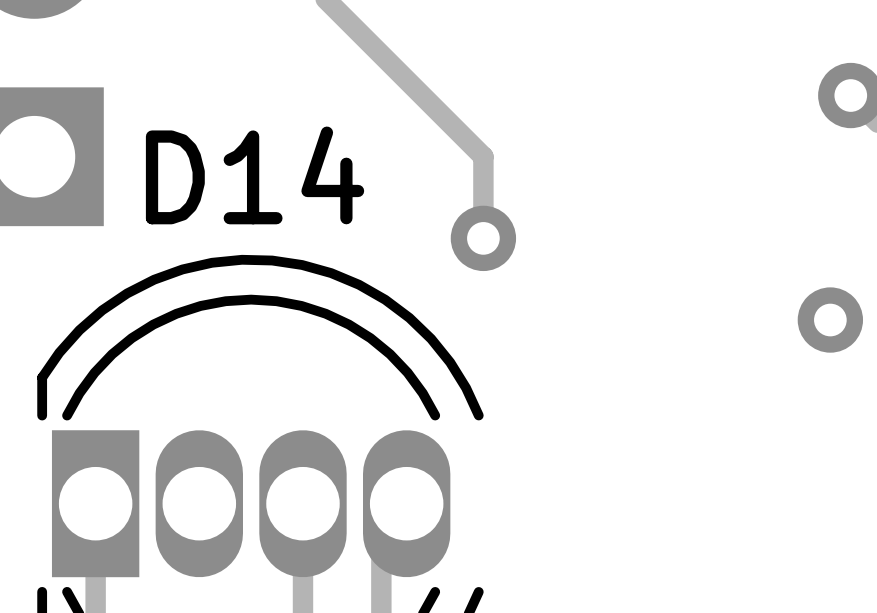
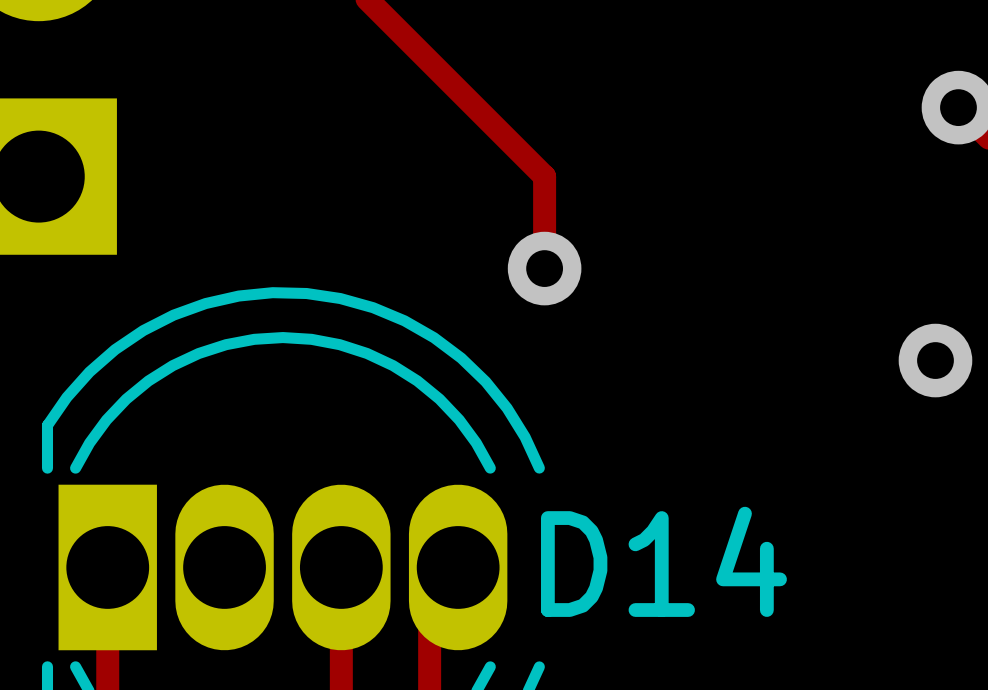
D14 name position: D14 (255, 175) -> D14 (663, 561)

